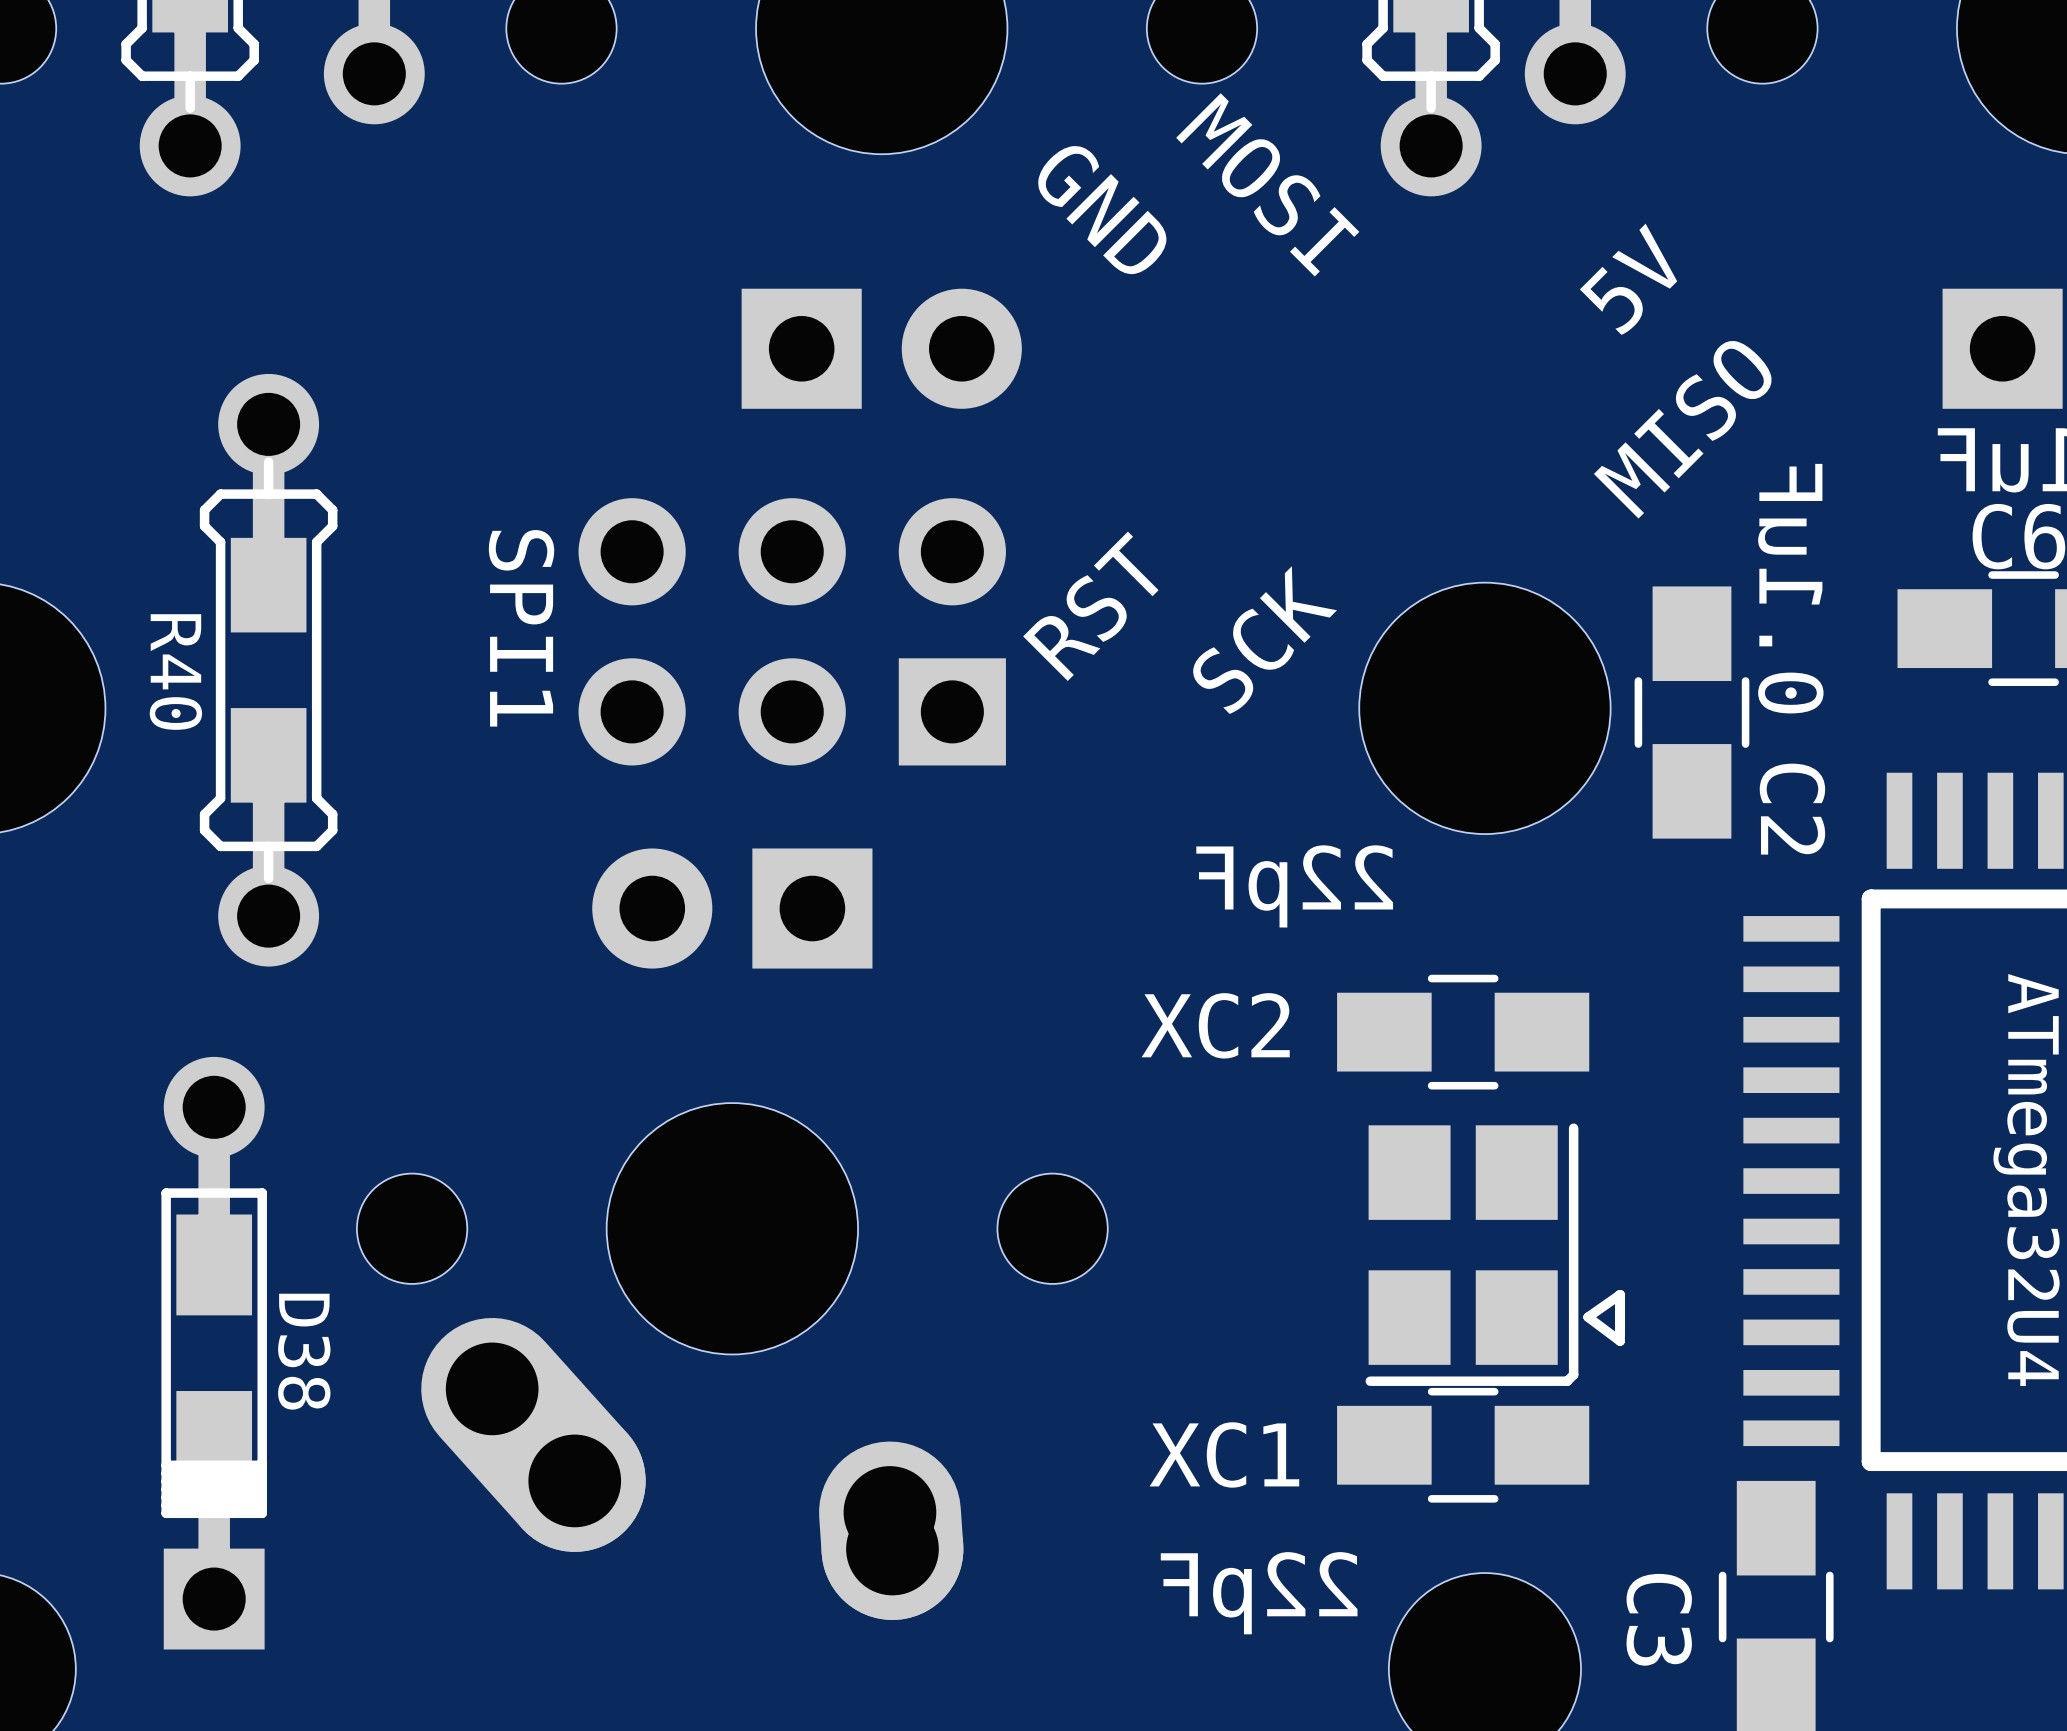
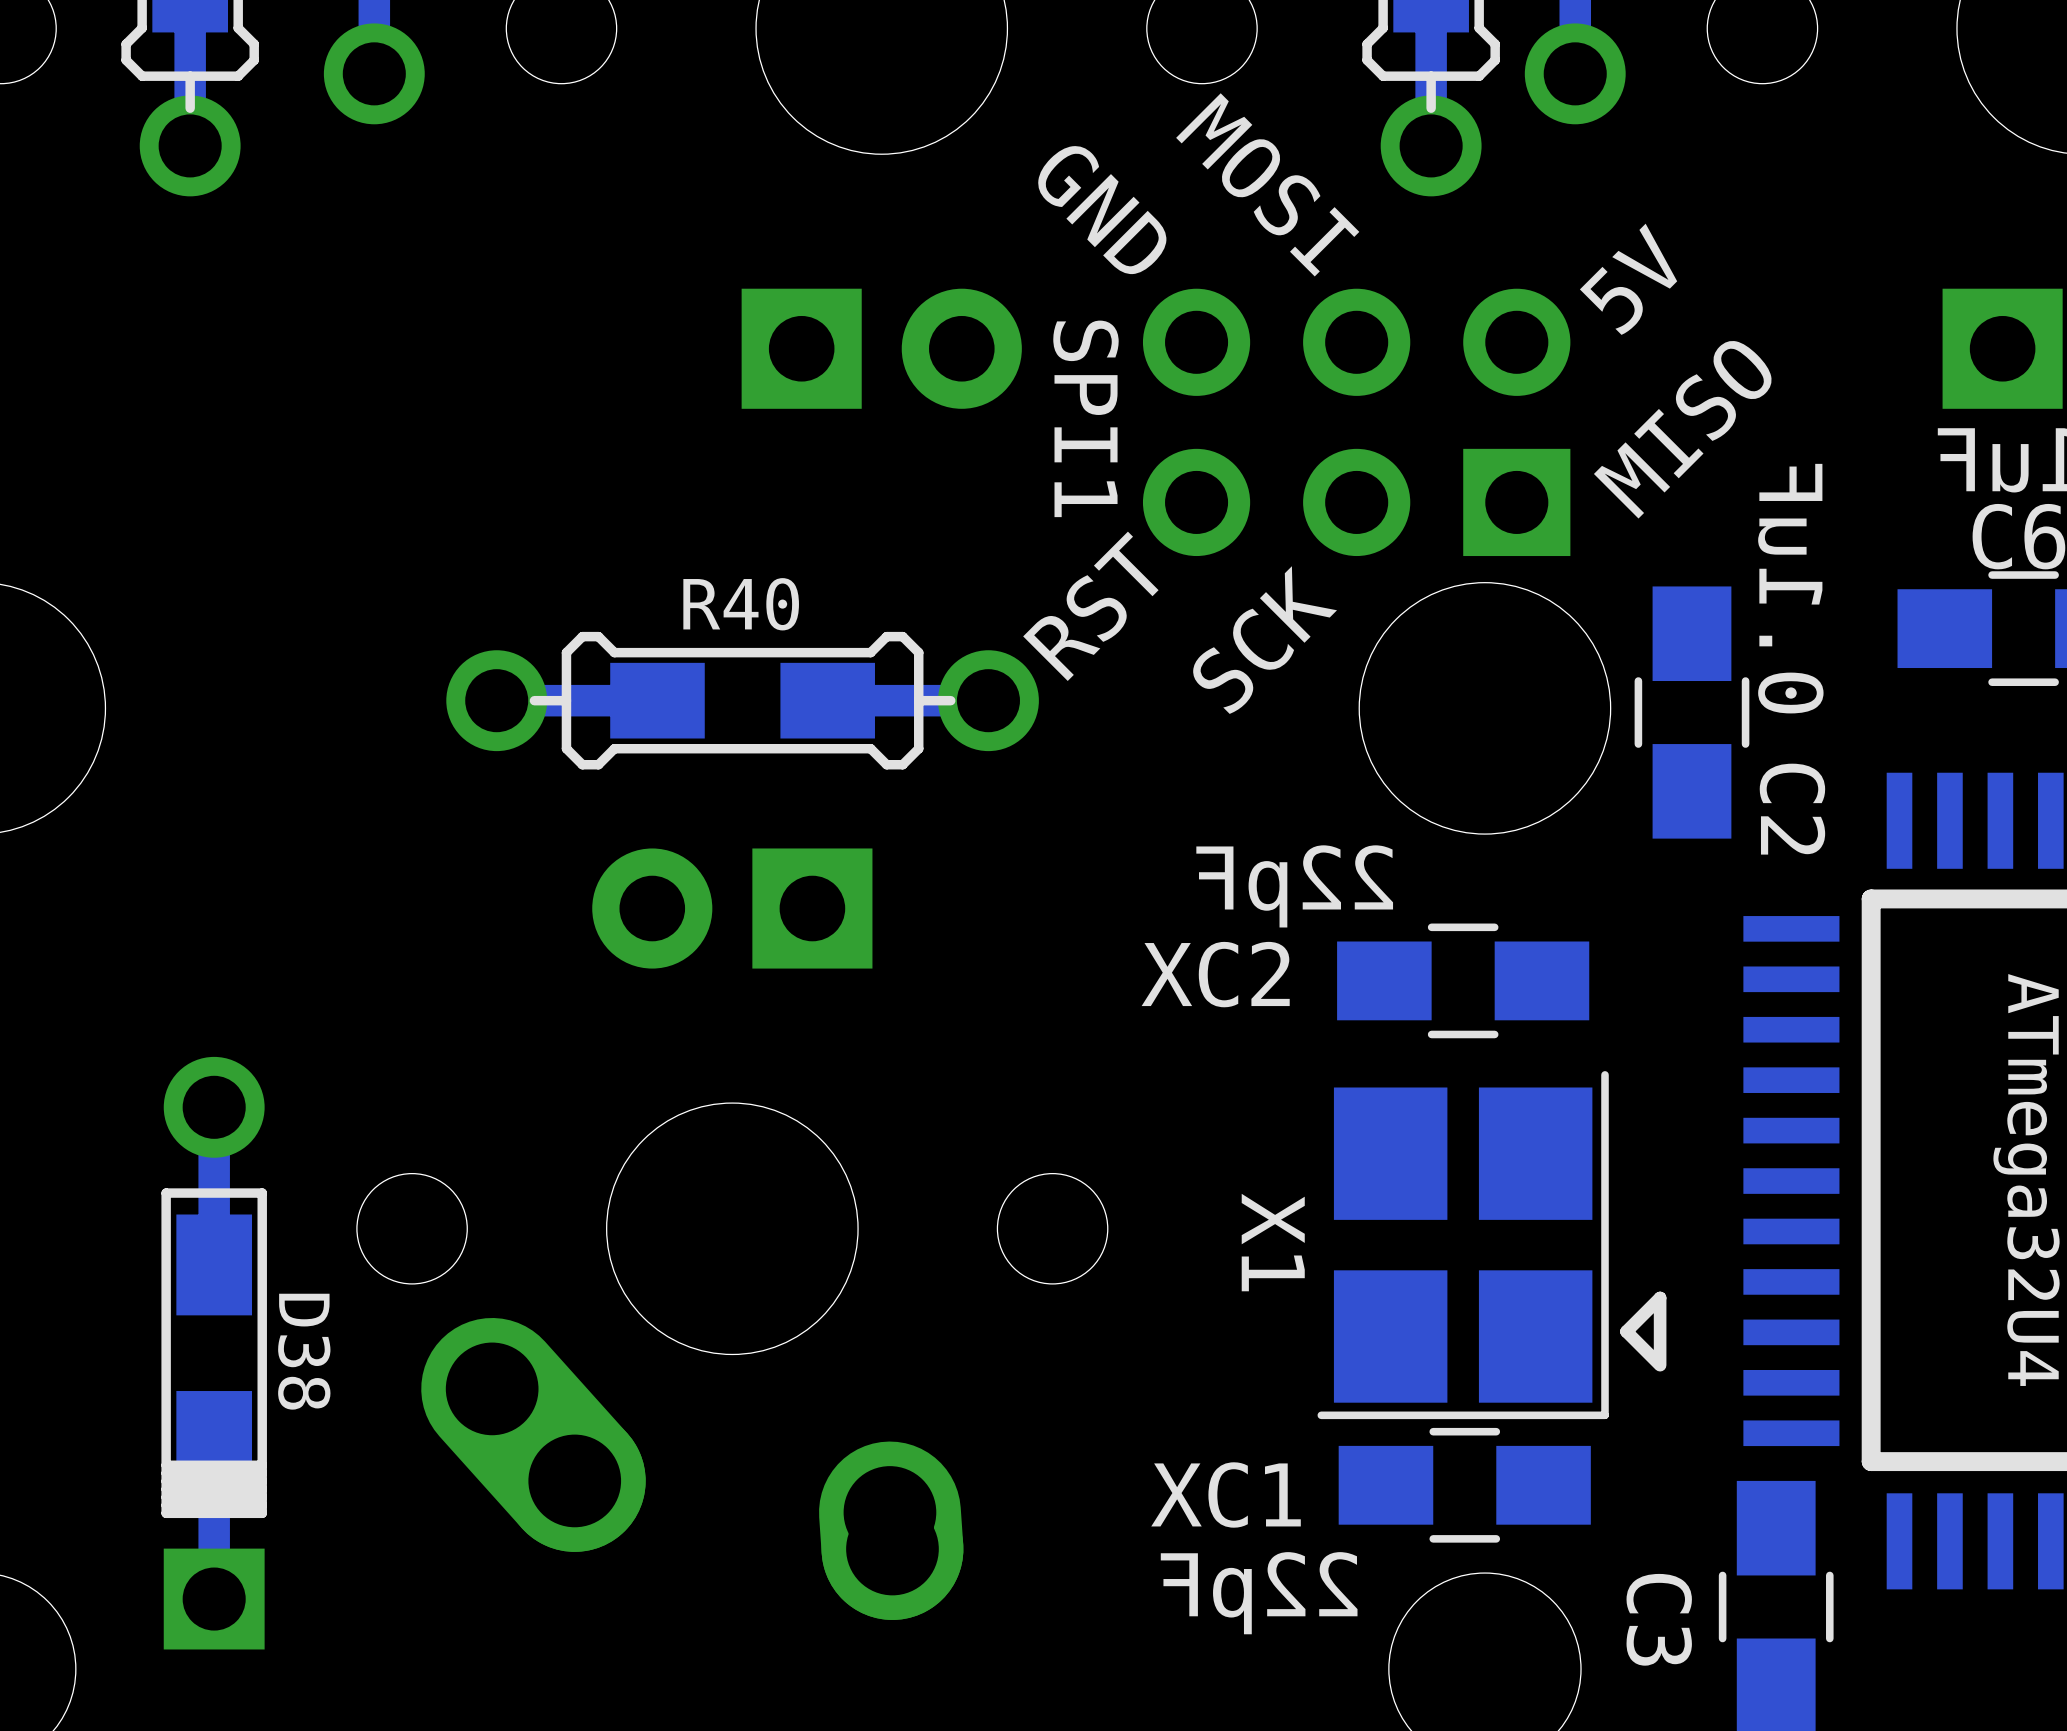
SPI1 position: (792, 631) -> (1356, 422)
R40 rotation: 0° (268, 670) -> 90° clockwise (742, 700)
R40 position: (268, 670) -> (742, 700)
XC2 position: (1463, 1032) -> (1463, 980)
X1: none -> (1463, 1245)
part: (1495, 1254) -> none
line: none -> (1658, 1363) (1626, 1331) (1660, 1297) (1660, 1365)
XC1 position: (1463, 1445) -> (1464, 1485)

